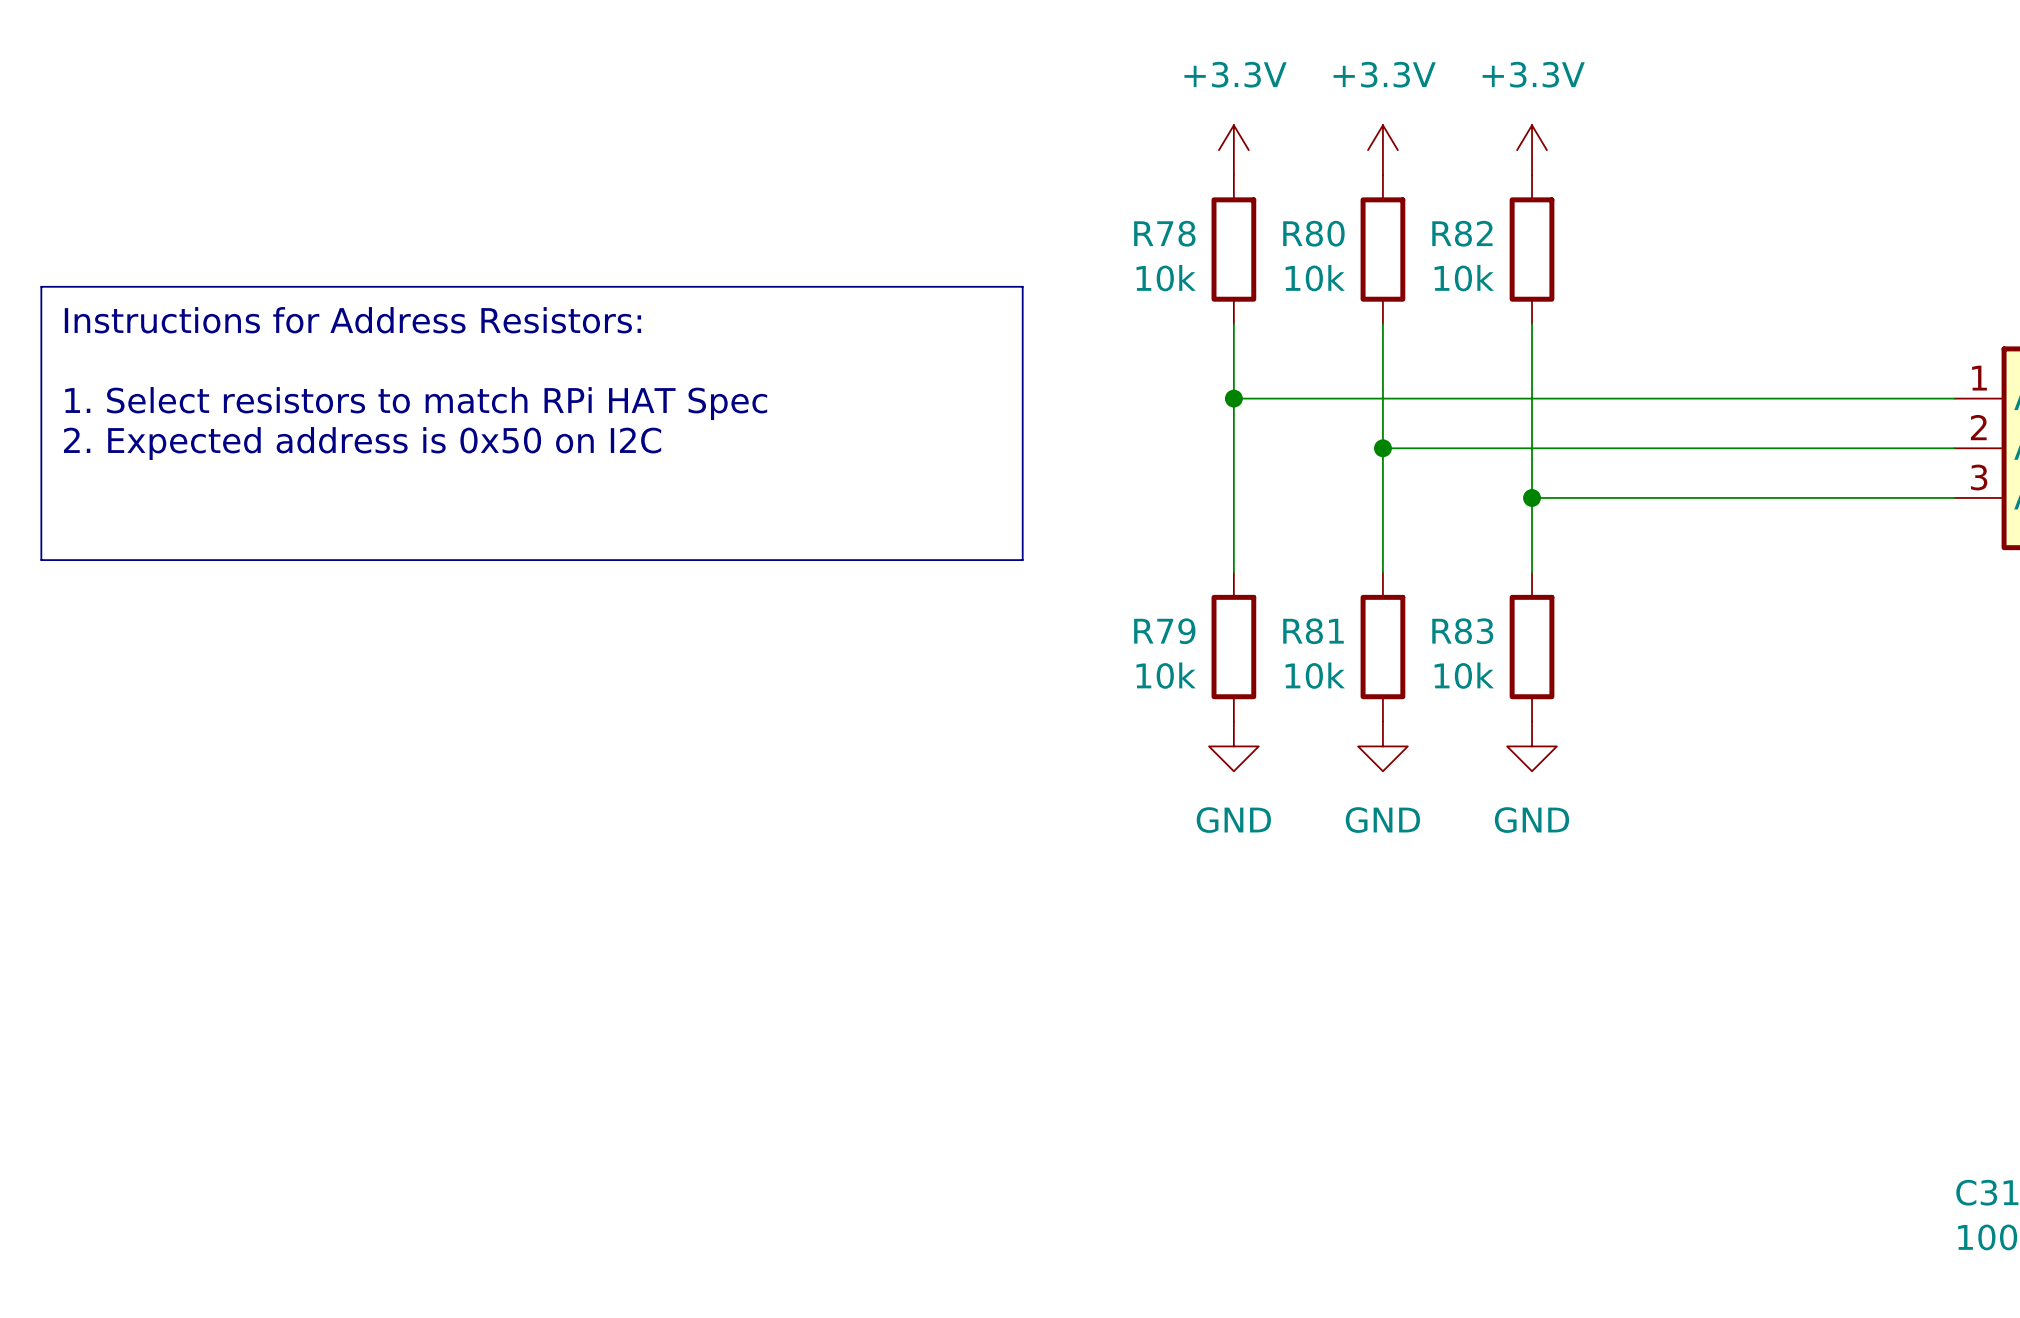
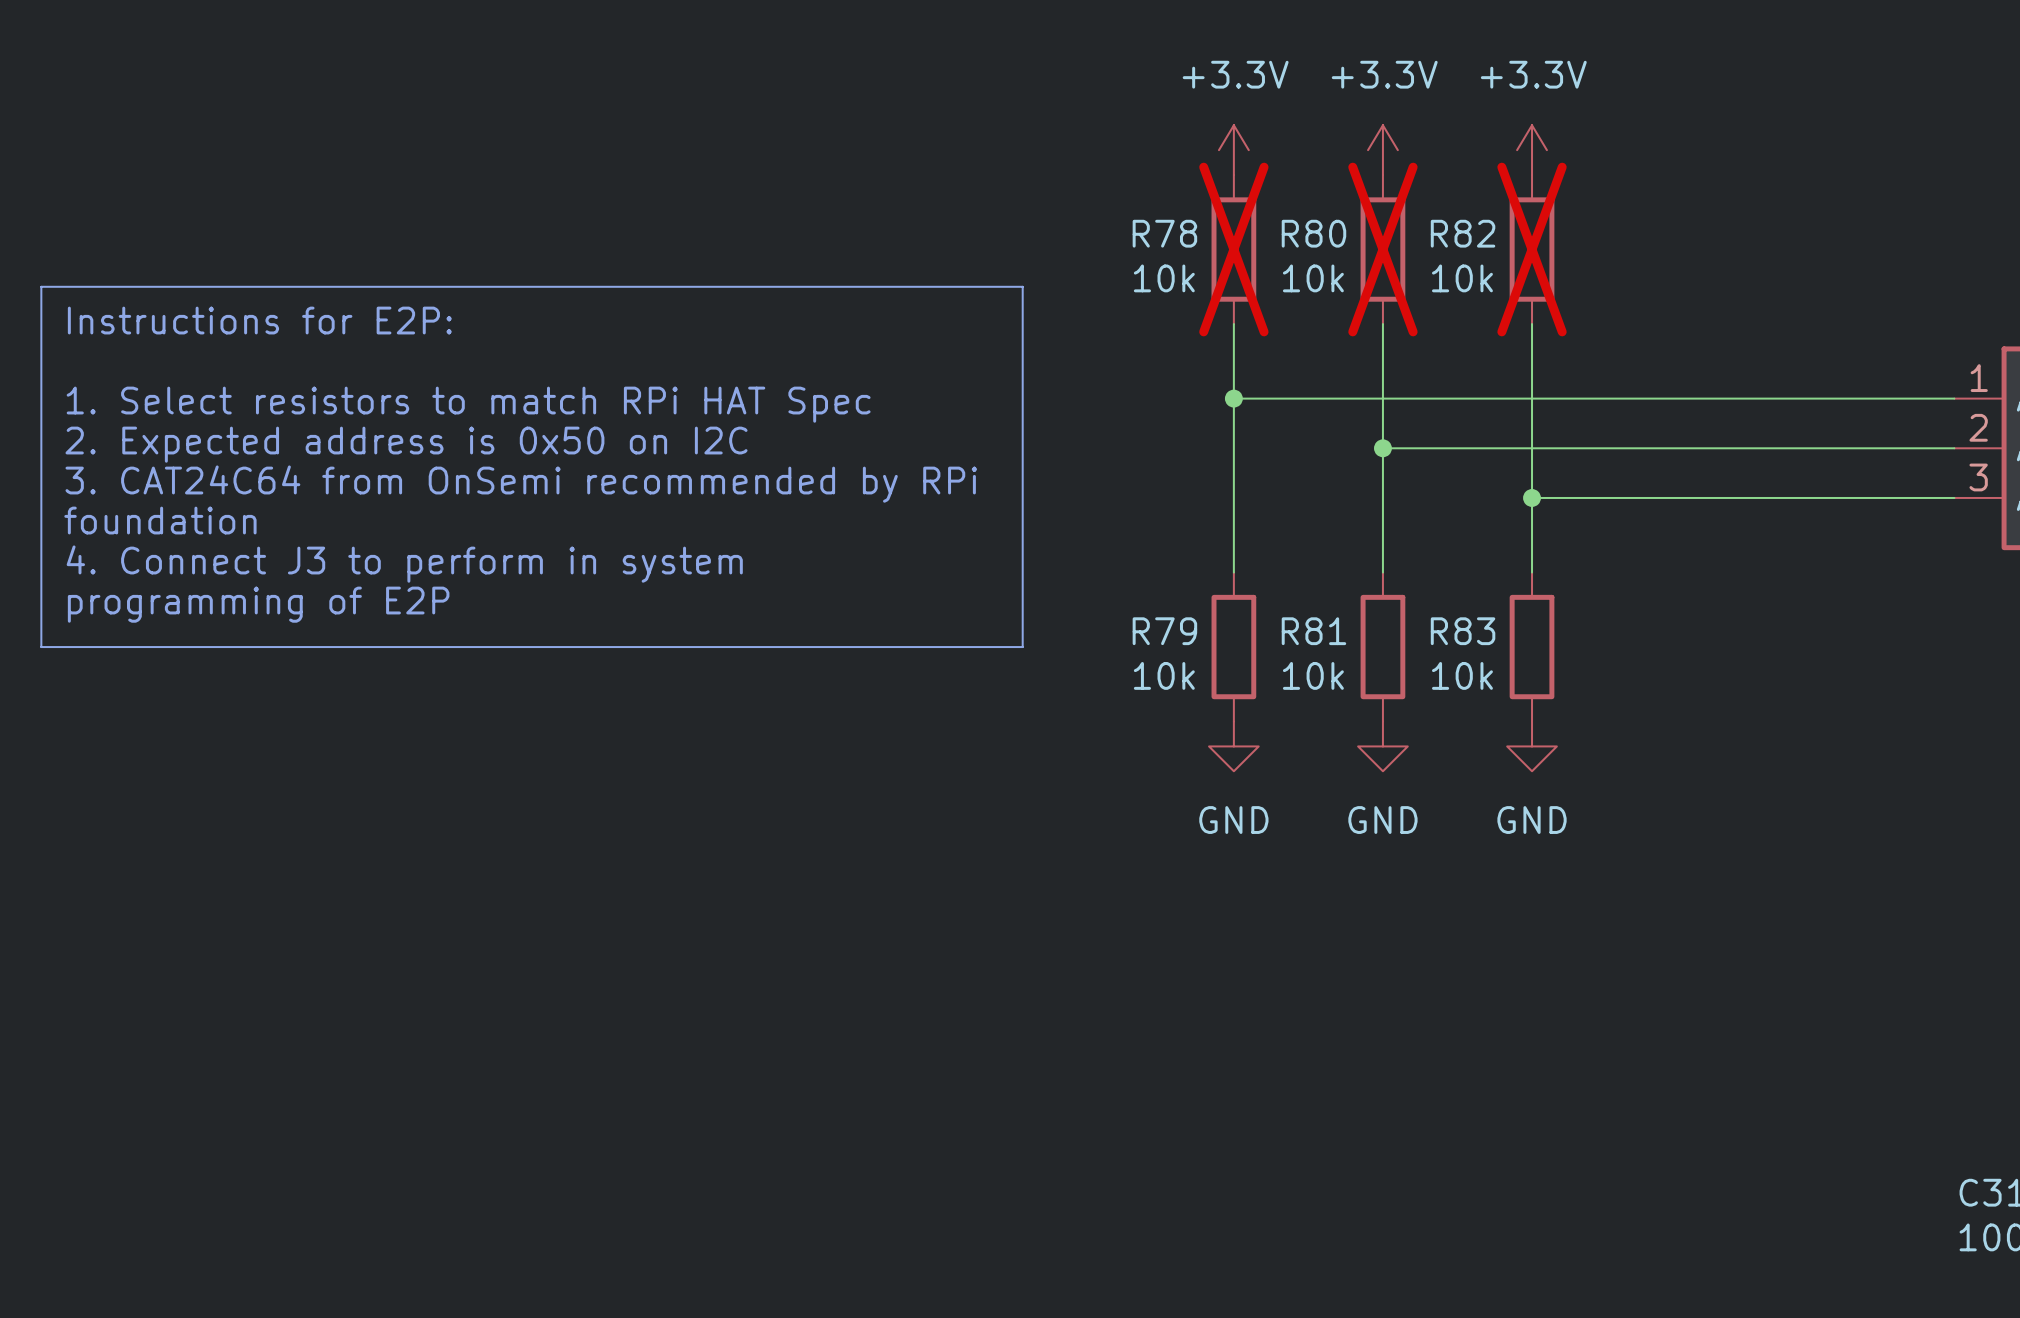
R78 do-not-place cross: none -> (1233, 249)
R80 do-not-place cross: none -> (1382, 249)
R82 do-not-place cross: none -> (1532, 249)
text: Instructions for Address Resistors: (352, 320) -> Instructions for E2P: (259, 320)
text: none -> 3. CAT24C64 from OnSemi recommended by RPi (521, 484)
text: none -> foundation (160, 520)
line: (41, 560) (1022, 560) -> (41, 560) (41, 647) (1022, 647) (1022, 560)
text: none -> 4. Connect J3 to perform in system (404, 564)
text: none -> programming of E2P (258, 604)

